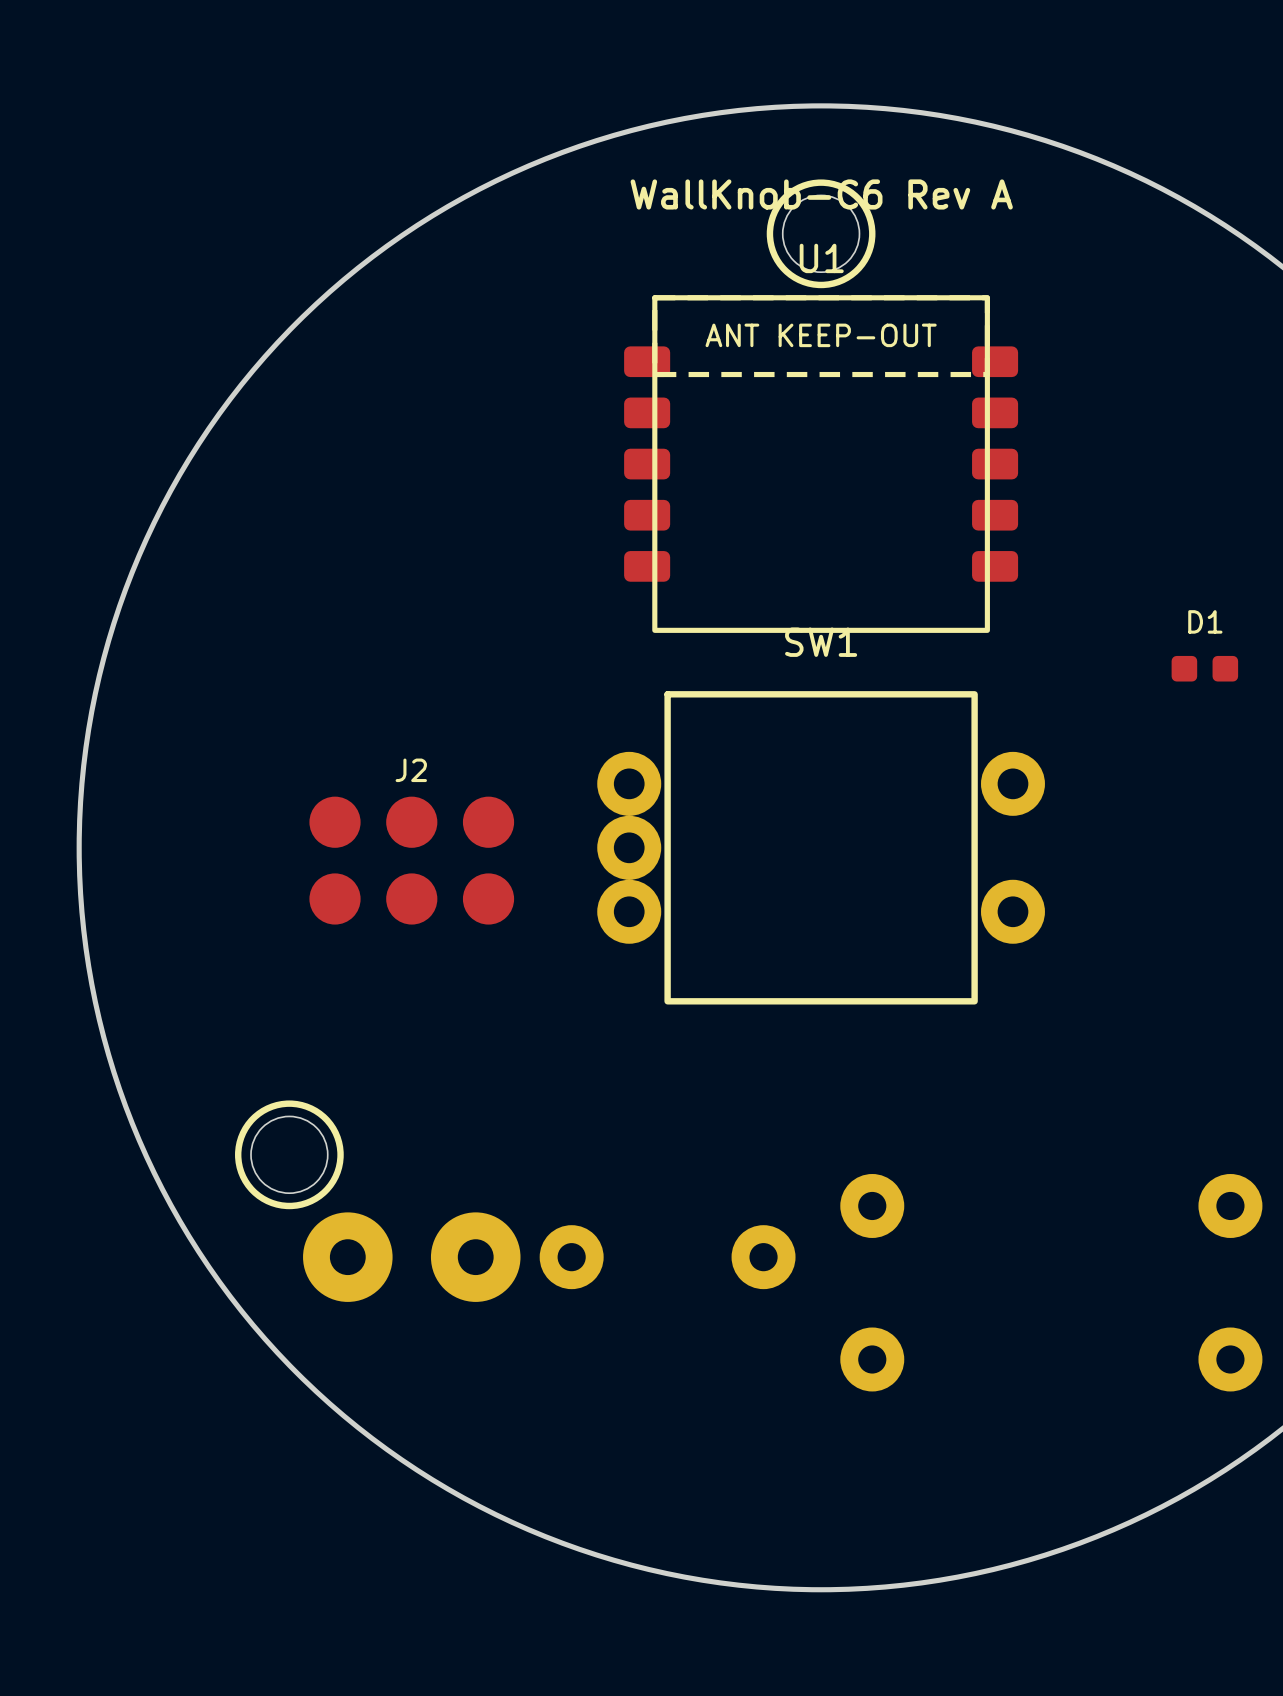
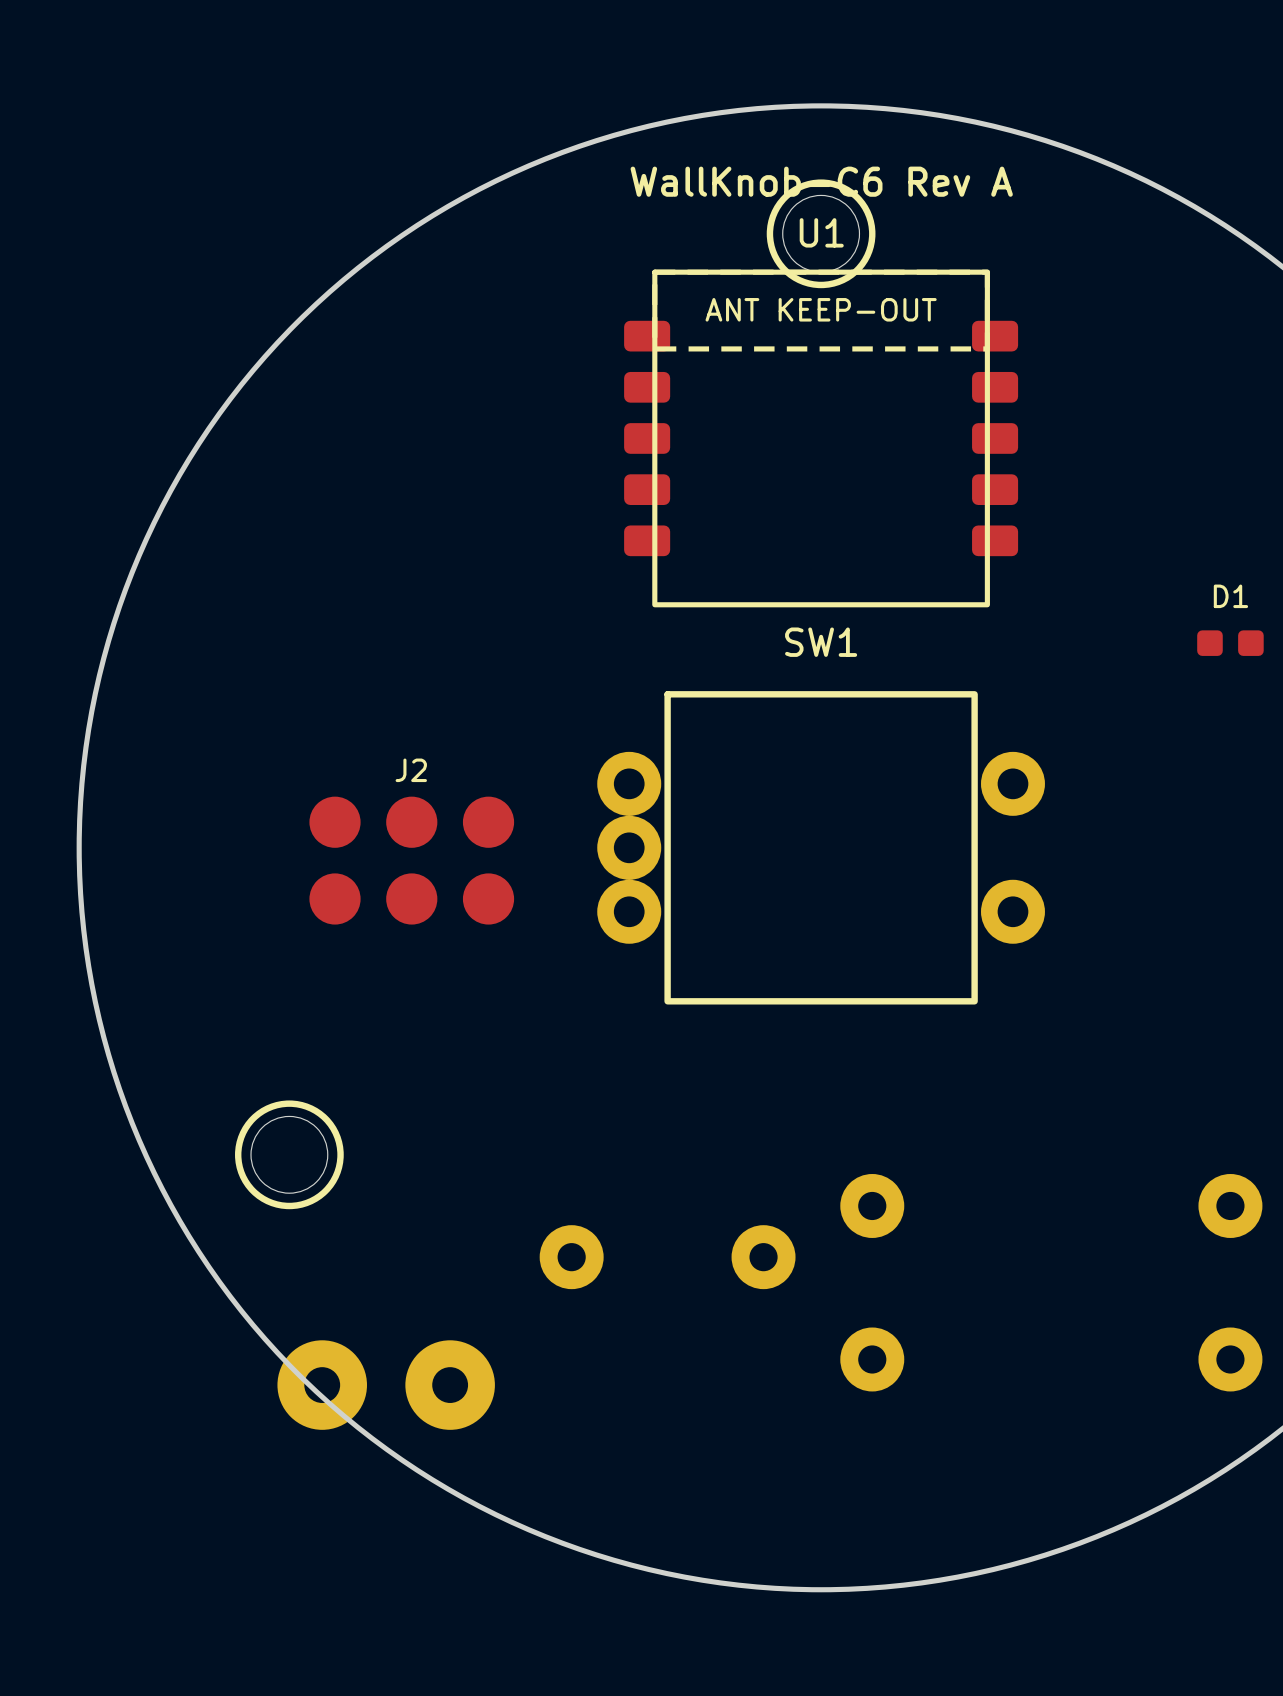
text position: WallKnob-C6 Rev A (821, 194) -> WallKnob-C6 Rev A (821, 181)
U1 position: (821, 464) -> (821, 438)
D1 position: (1204, 668) -> (1230, 643)
part position: (411, 1257) -> (386, 1385)

